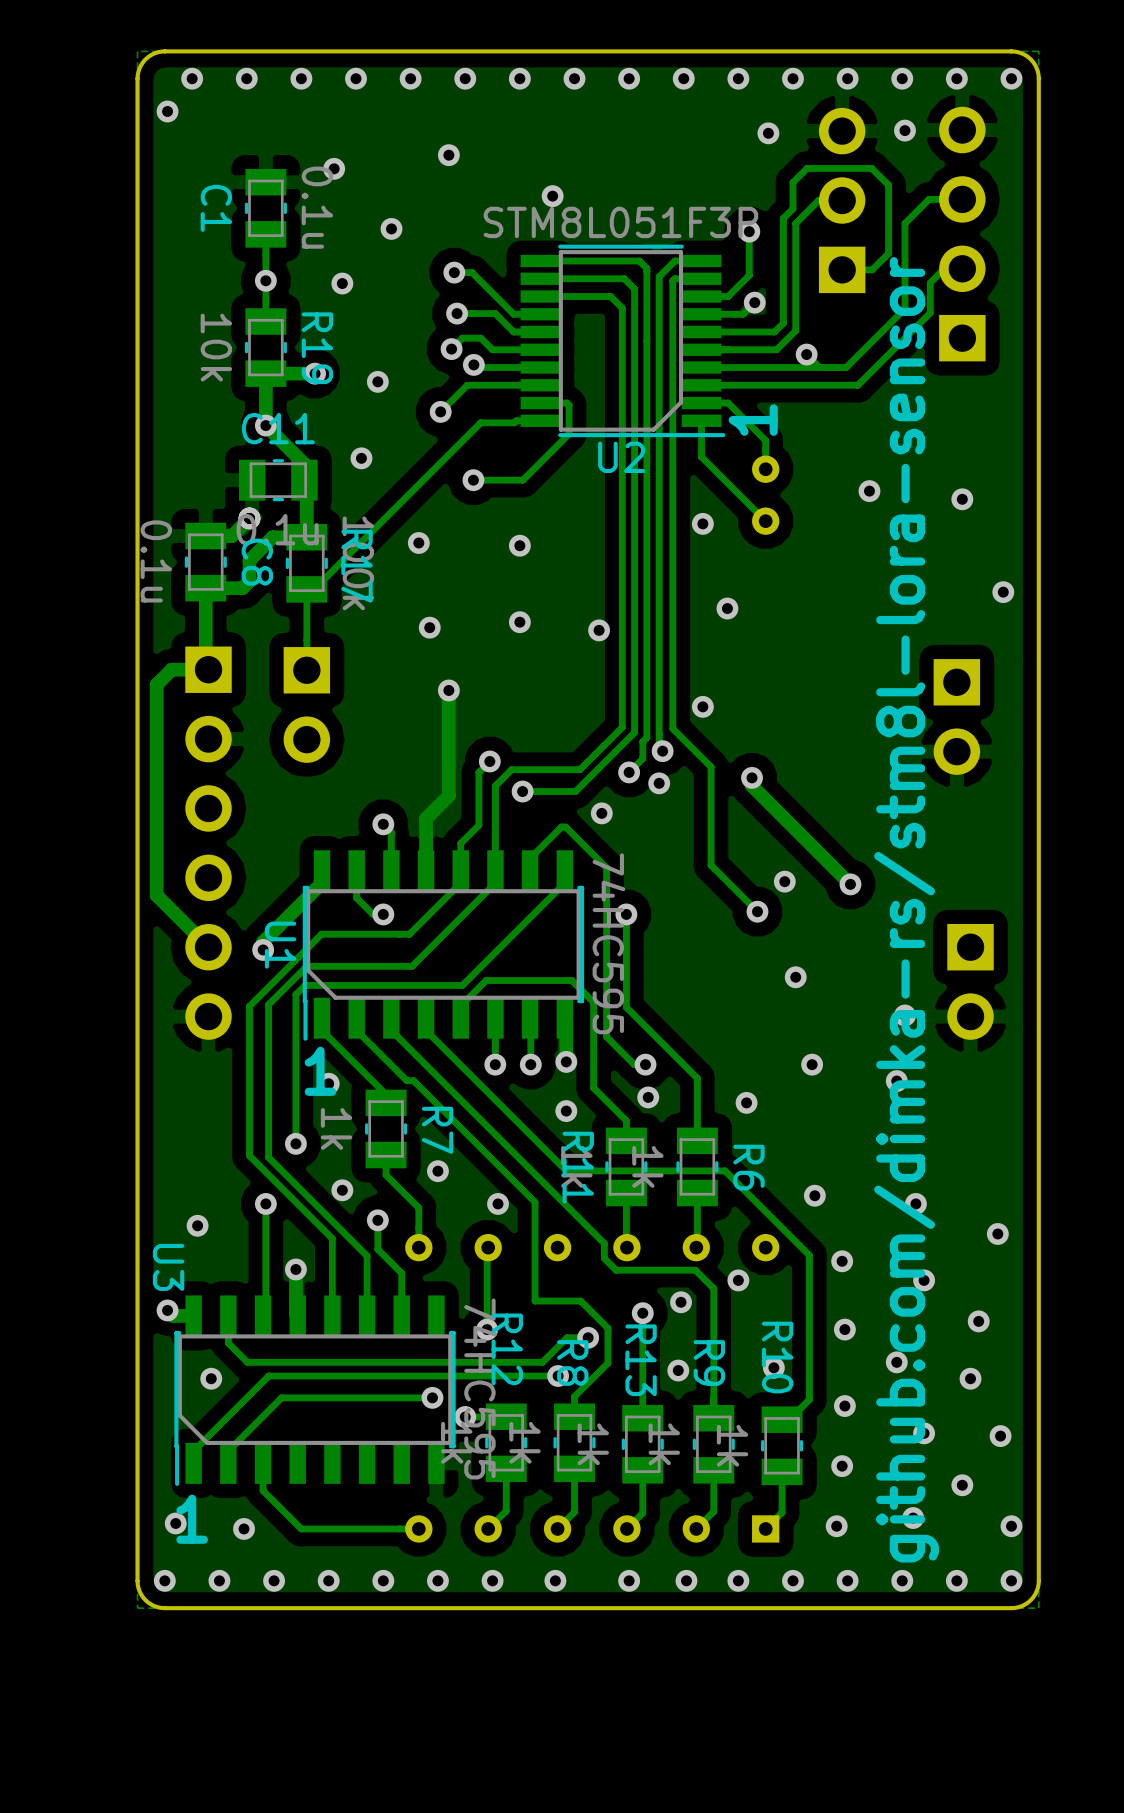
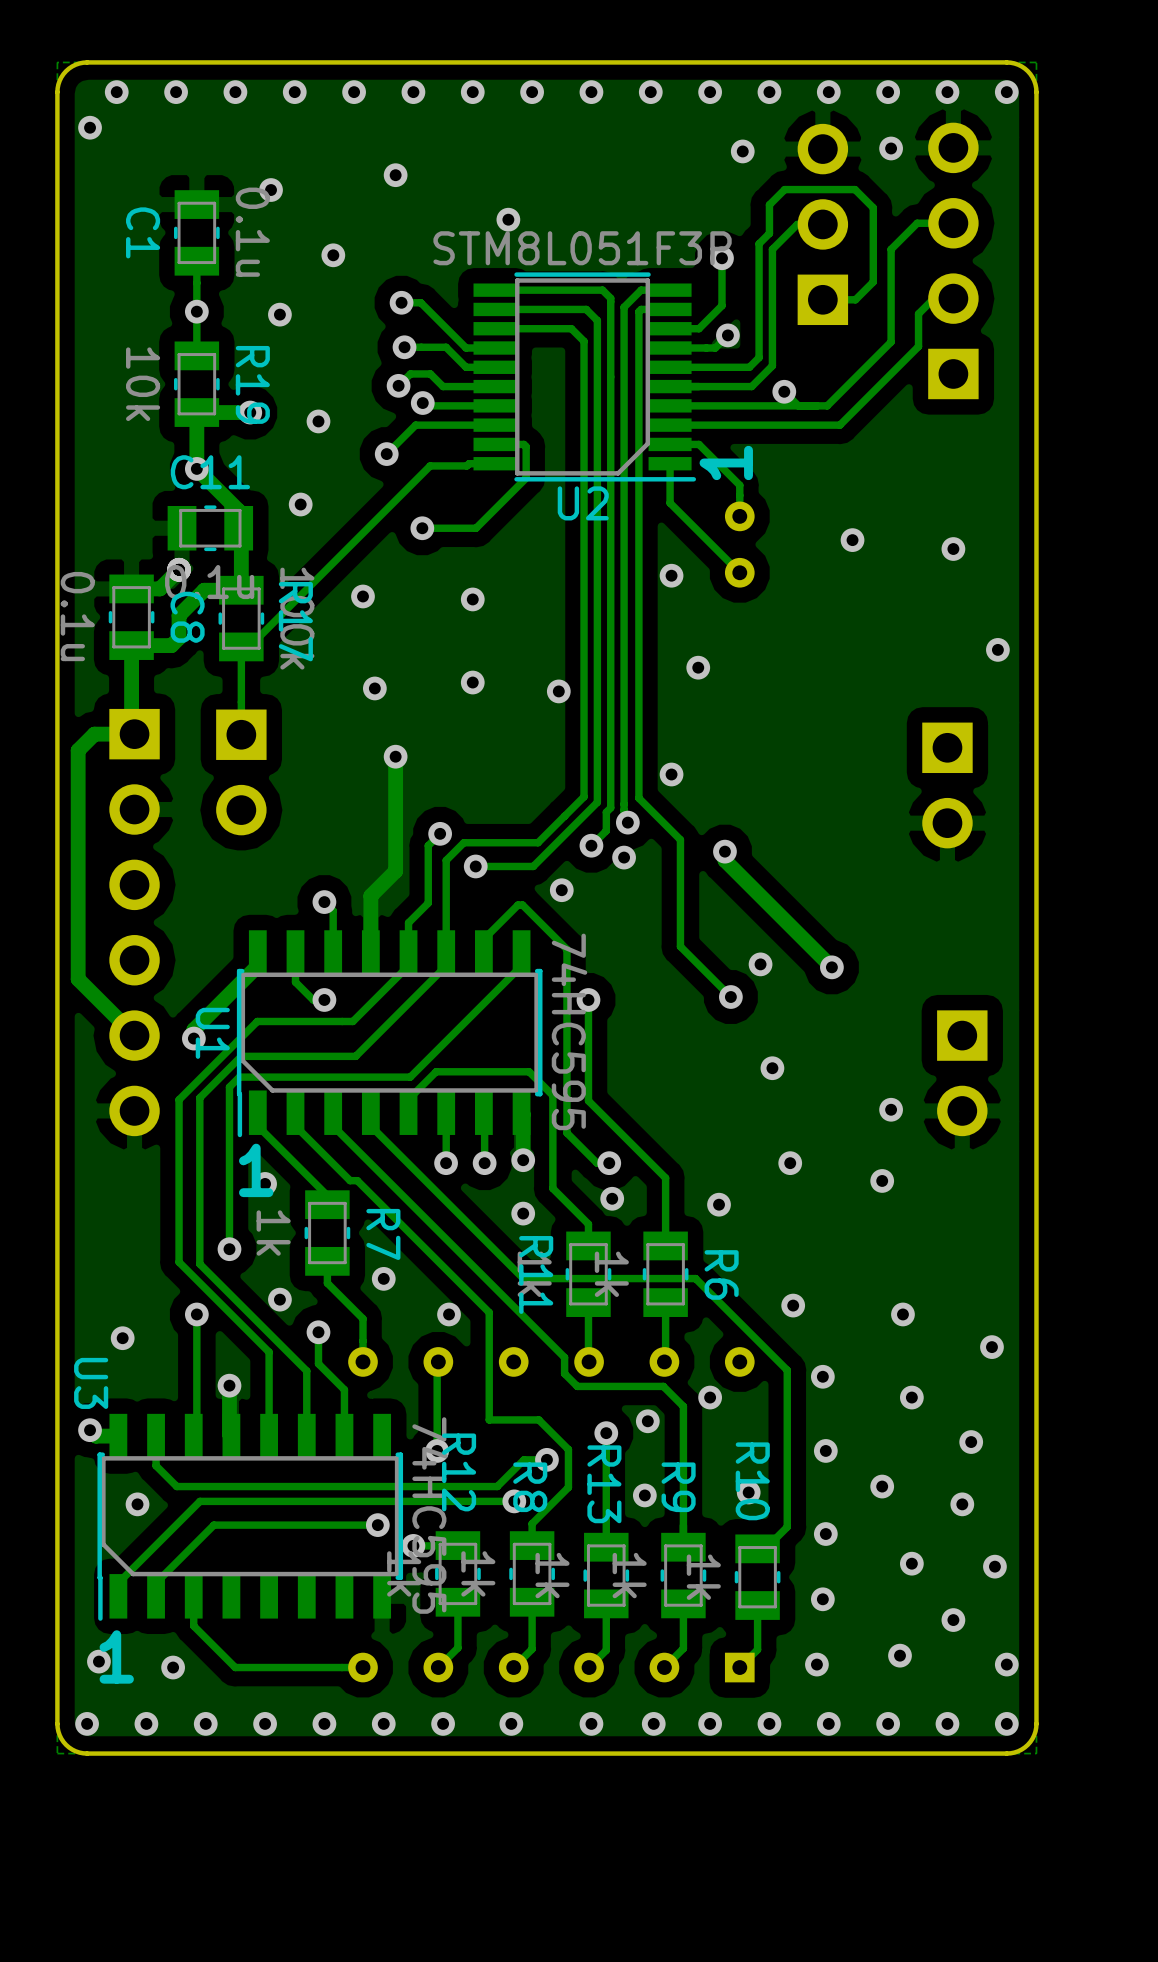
text: github.com/dimka-rs/stm8l-lora-sensor (906, 909) -> none

